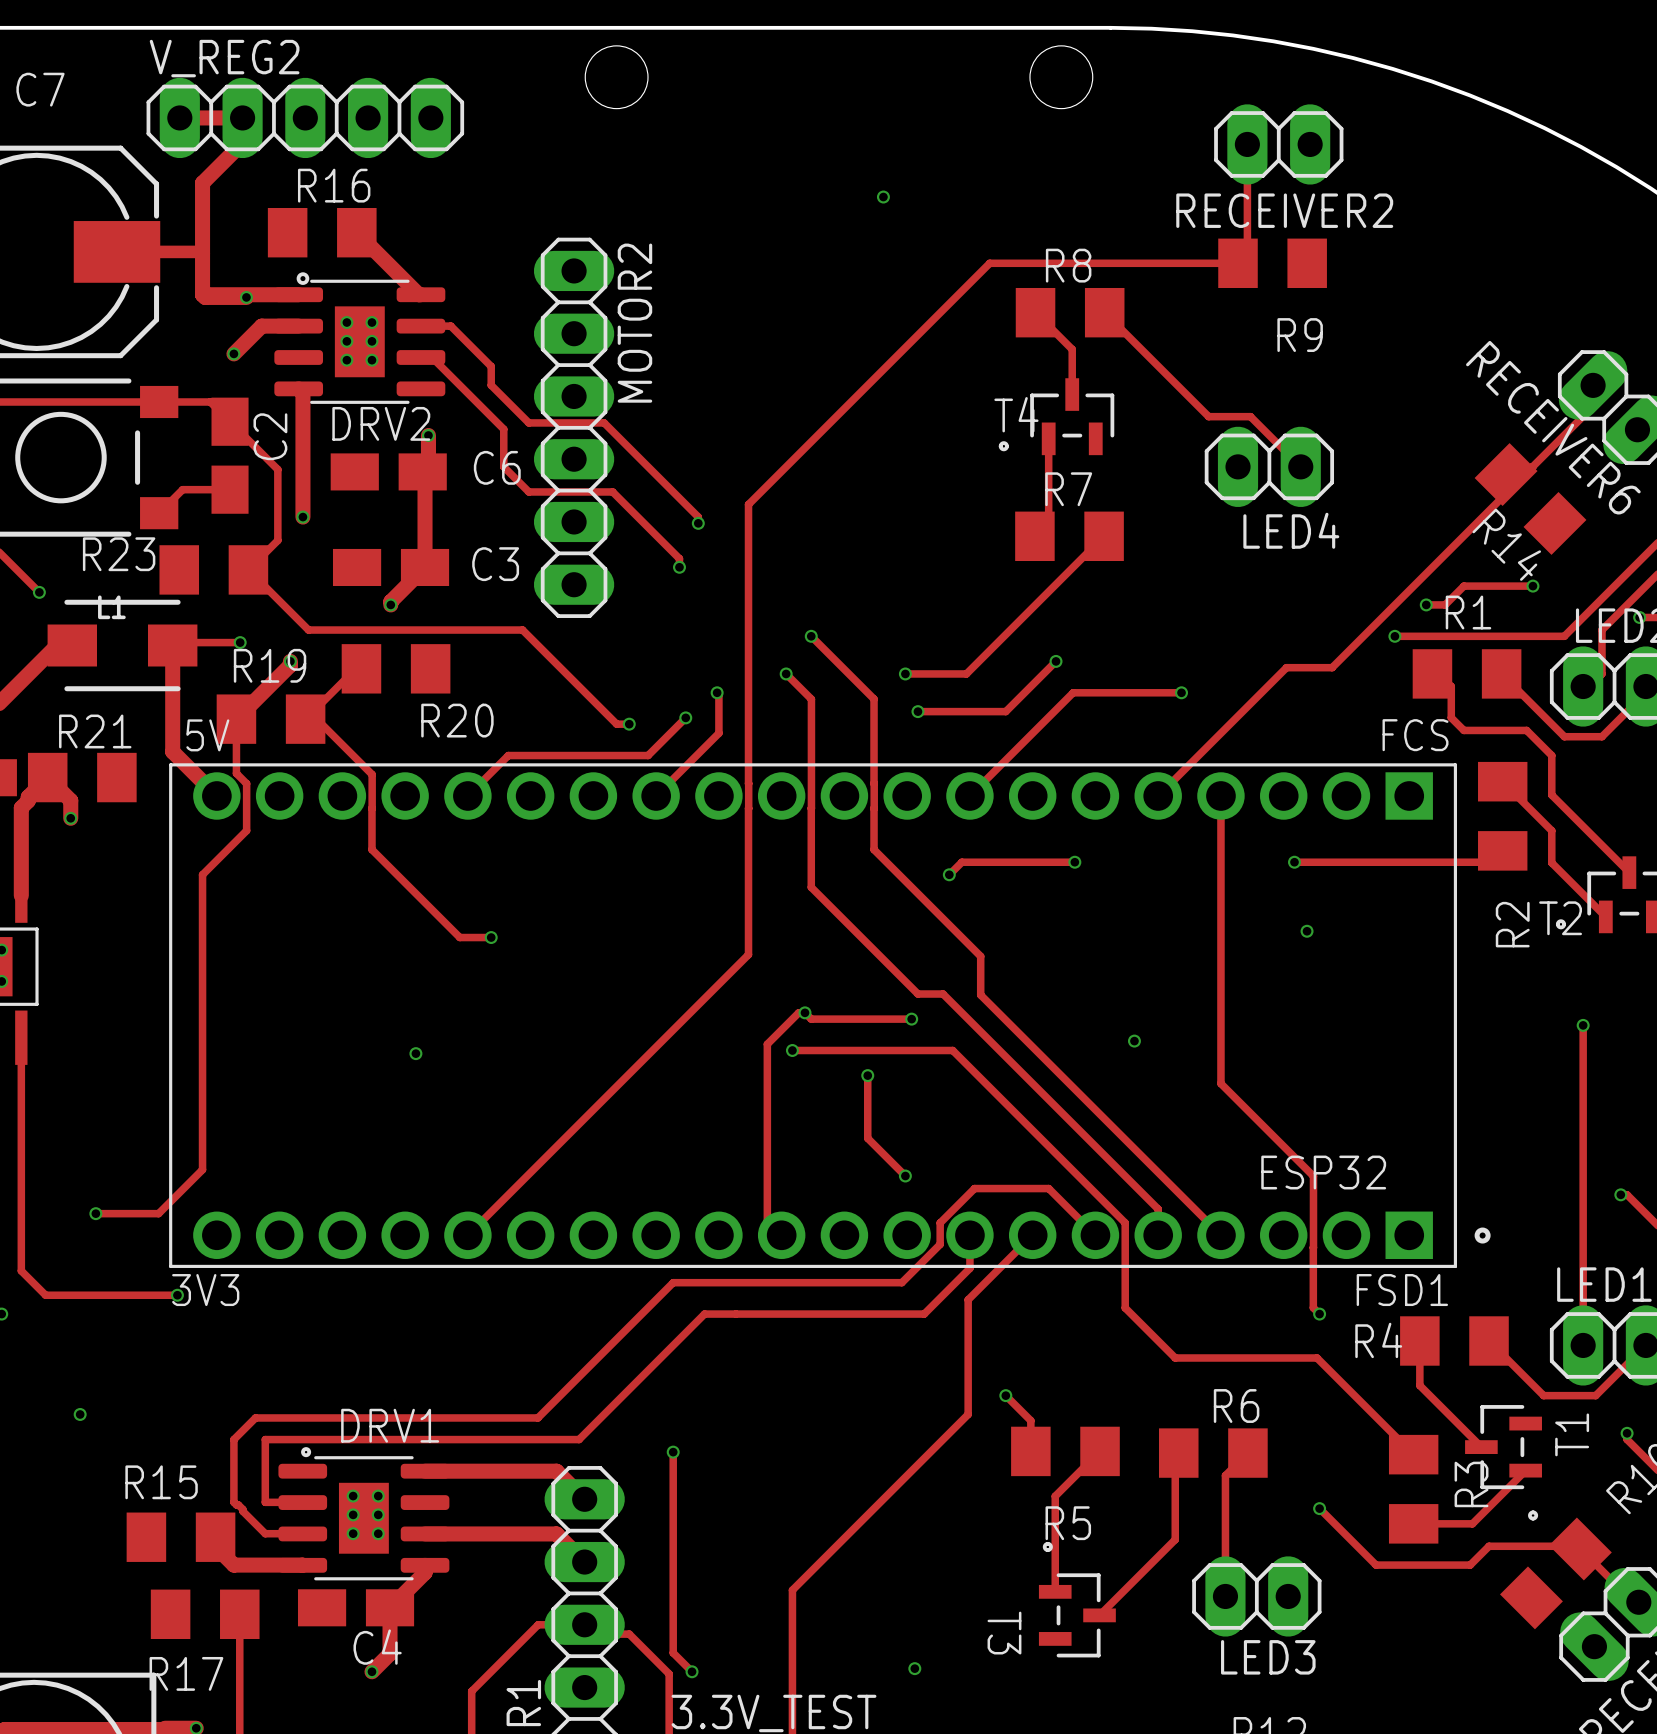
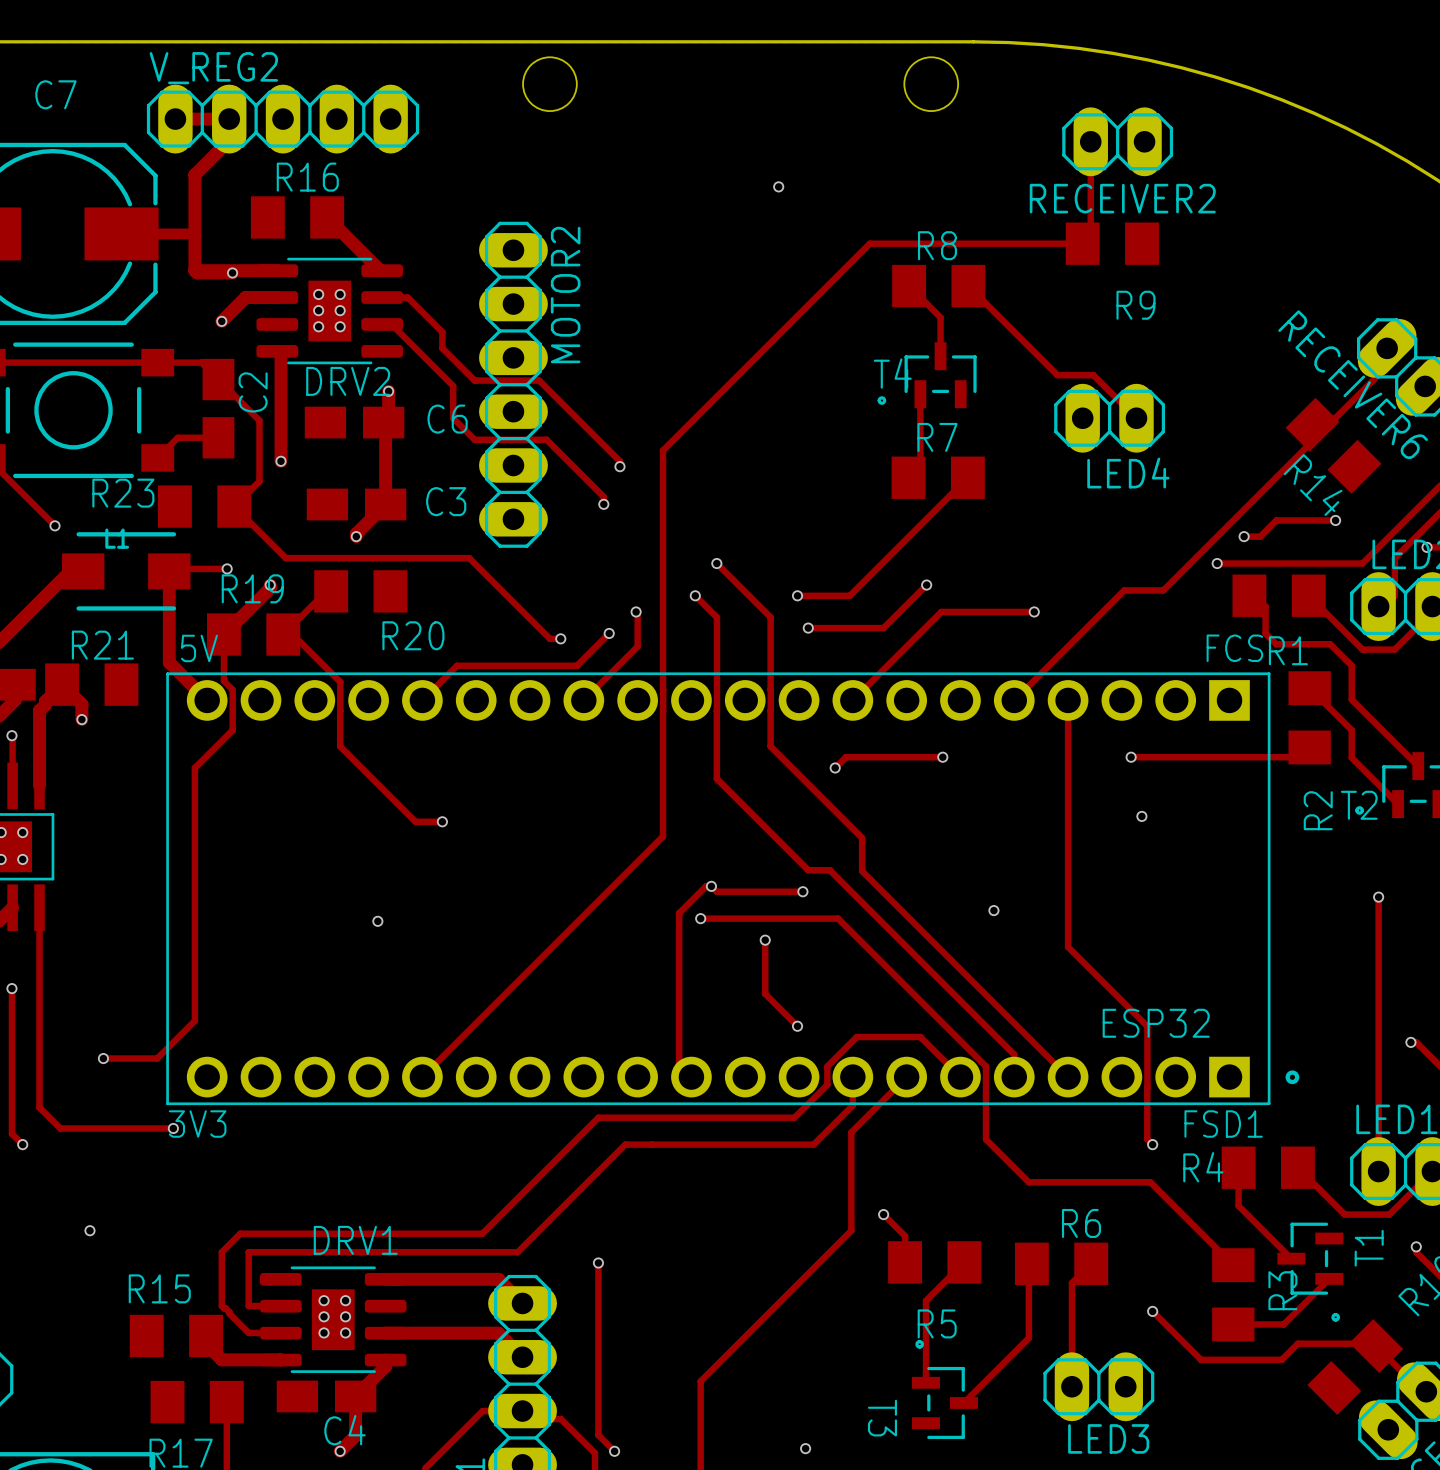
drawing: [296, 272, 310, 285] -> none
R1 name position: R1 (1468, 612) -> R1 (1288, 650)
drawing: [301, 1447, 312, 1458] -> none

